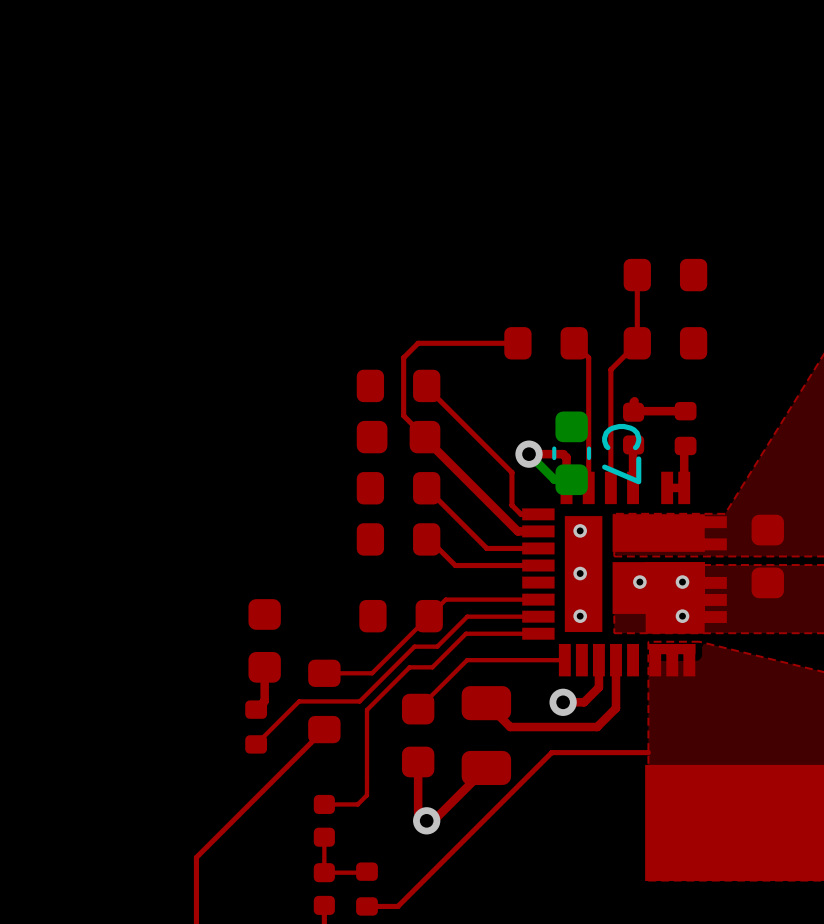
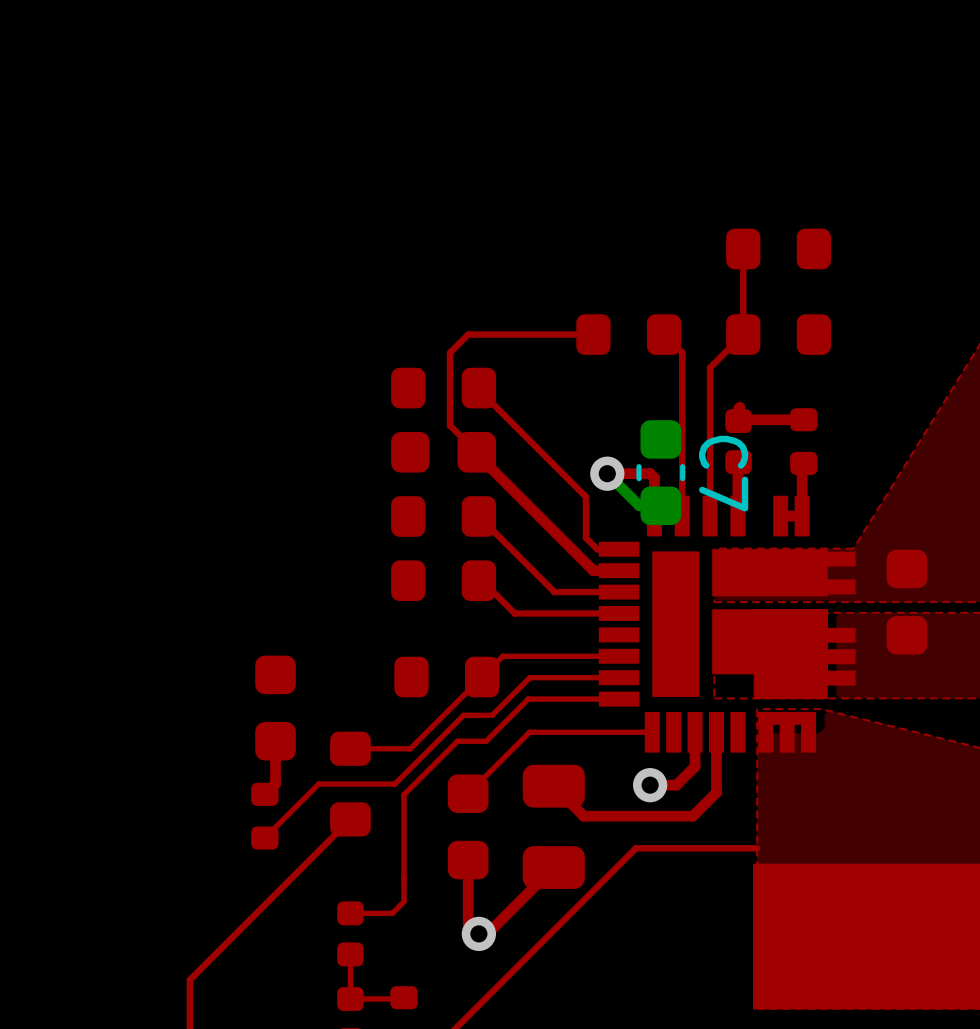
via: (580, 530) -> none
via: (580, 573) -> none
via: (639, 582) -> none
via: (682, 582) -> none
via: (580, 616) -> none
via: (682, 616) -> none

